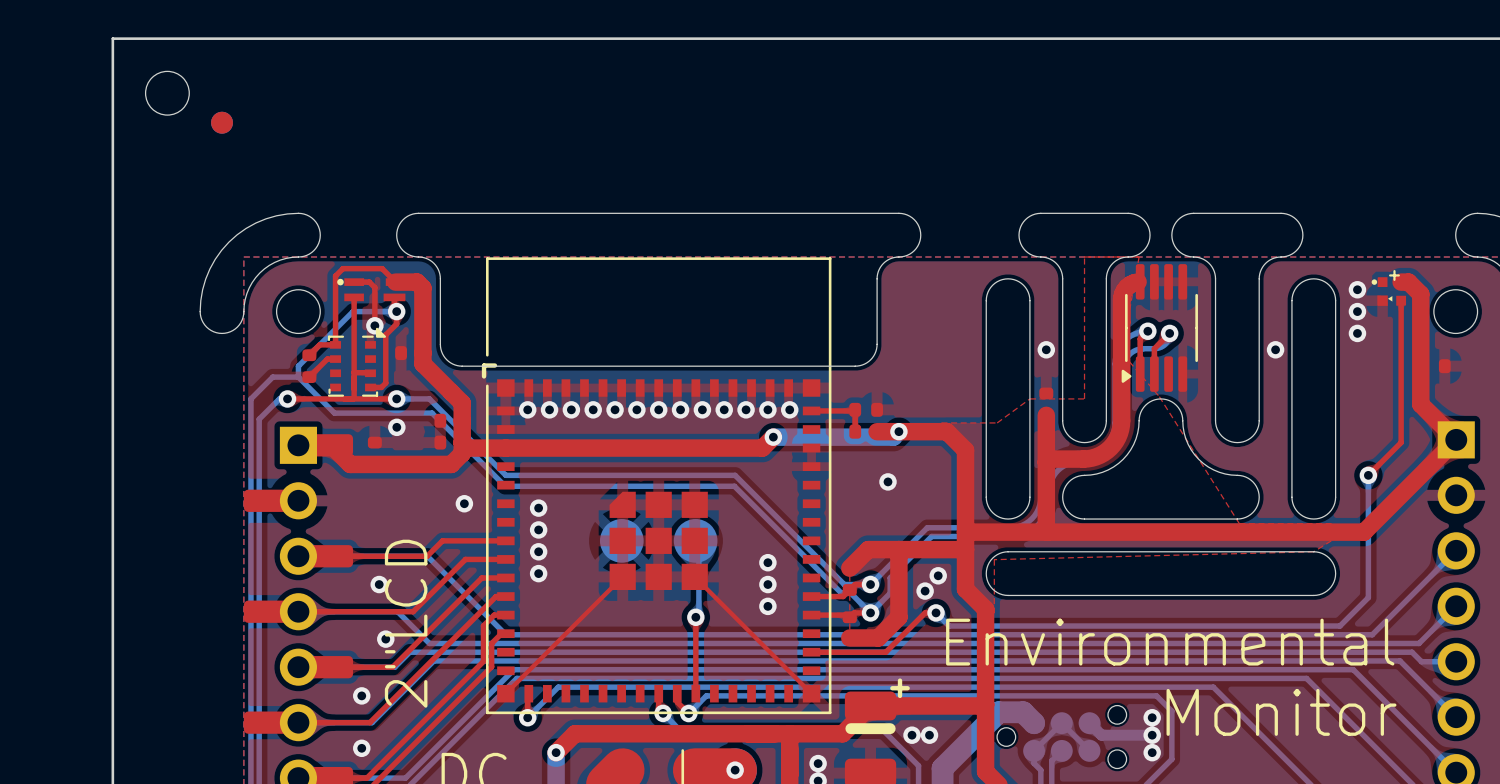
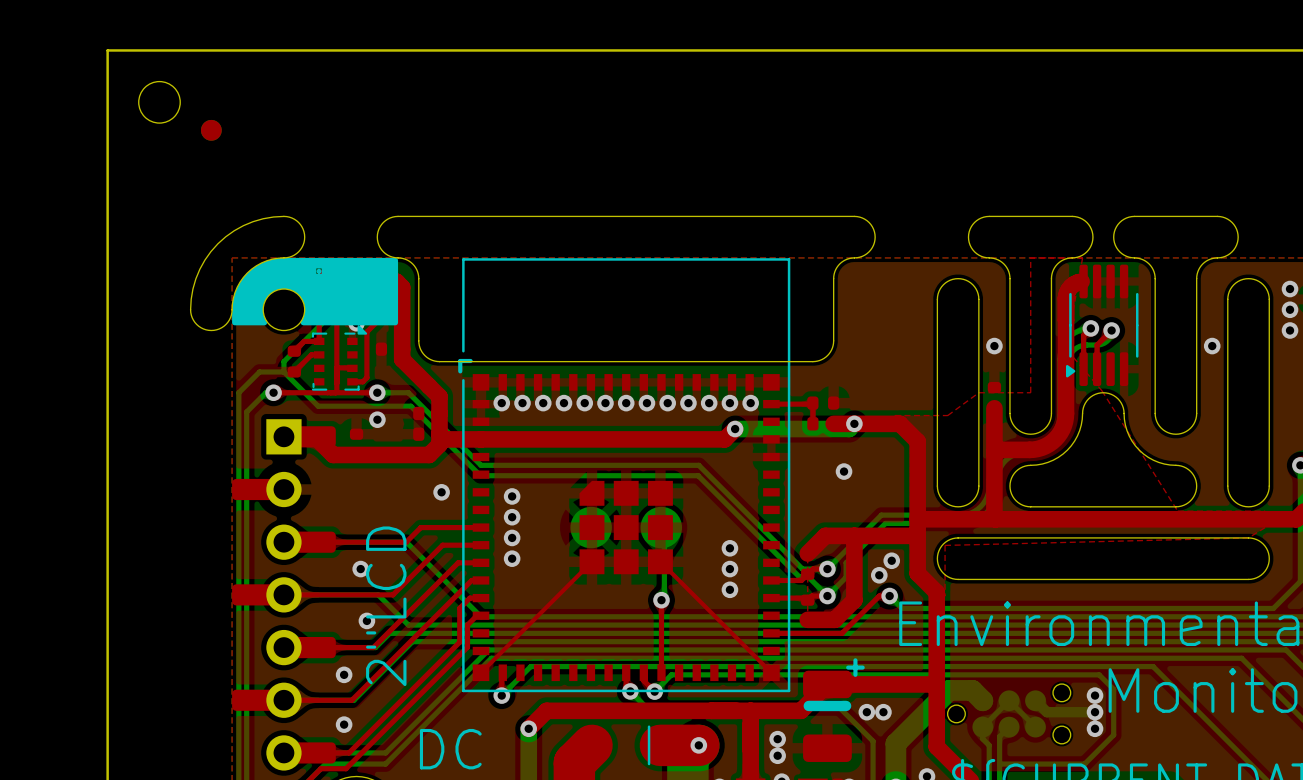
drawing: none -> [232, 257, 399, 326]
text: none -> . (319, 271)

